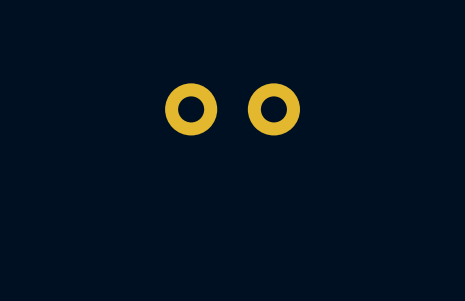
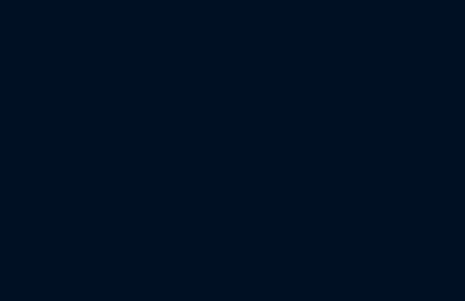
part: (232, 109) -> none

